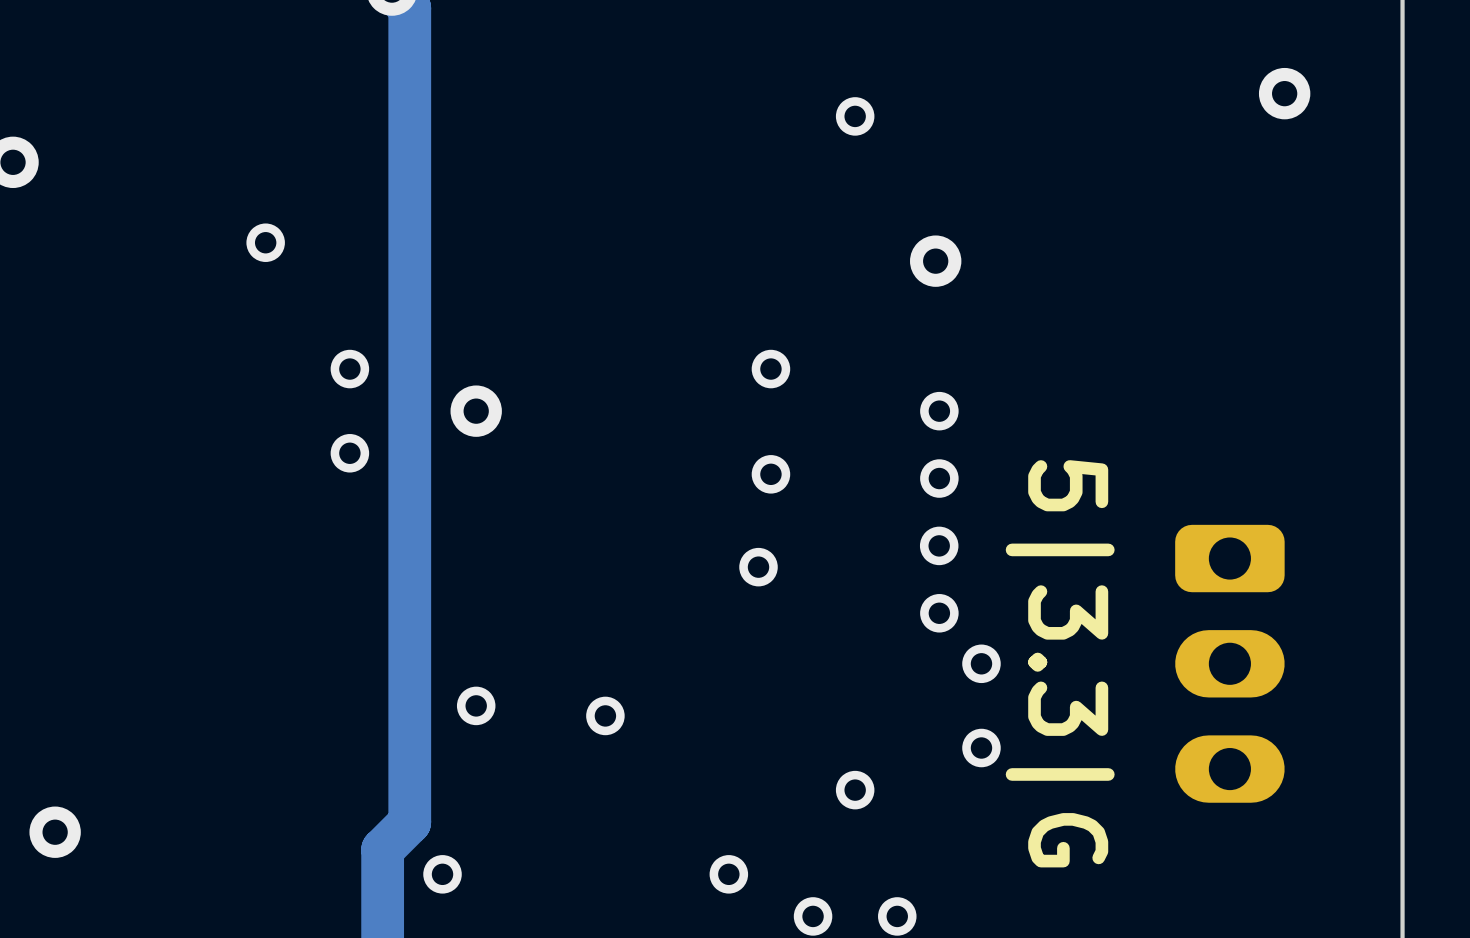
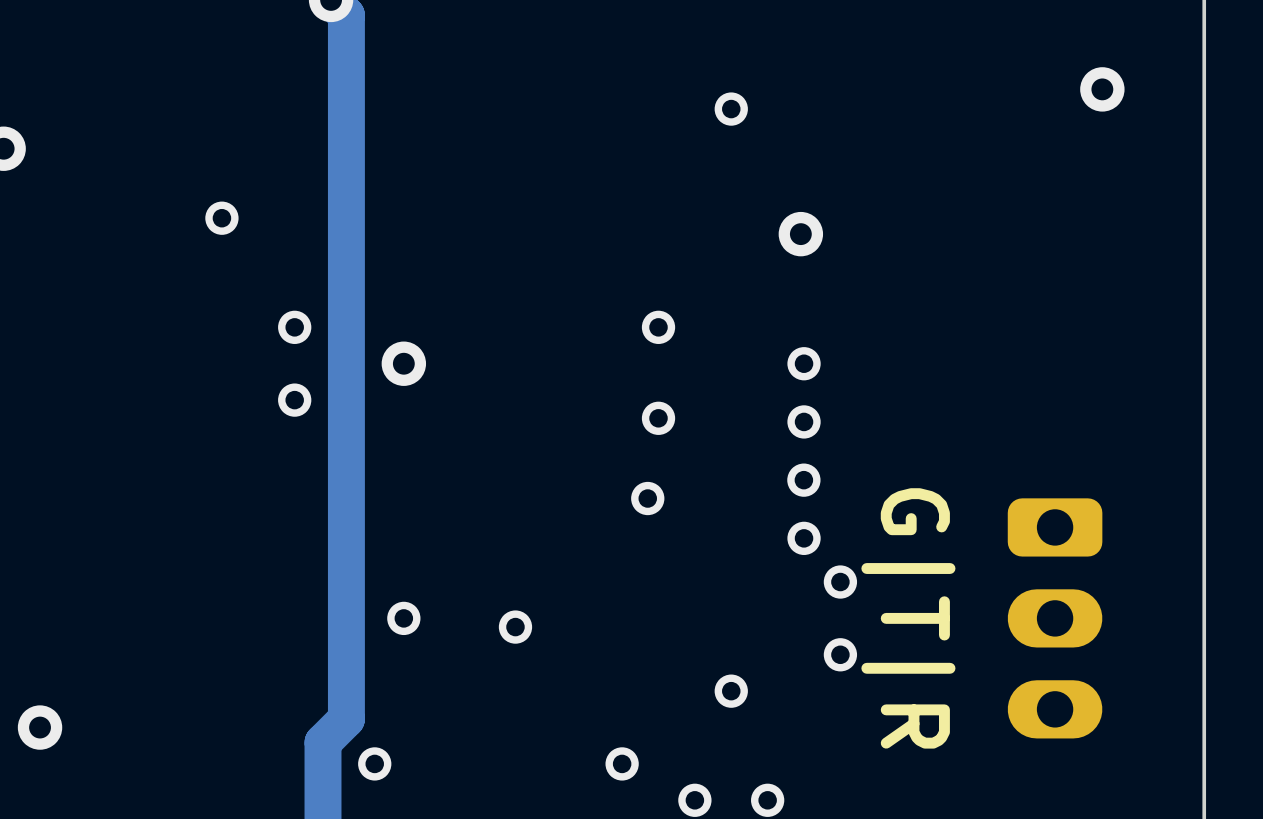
text: 5|3.3|G (1060, 663) -> G|T|R (908, 618)
part position: (1229, 663) -> (1055, 618)

